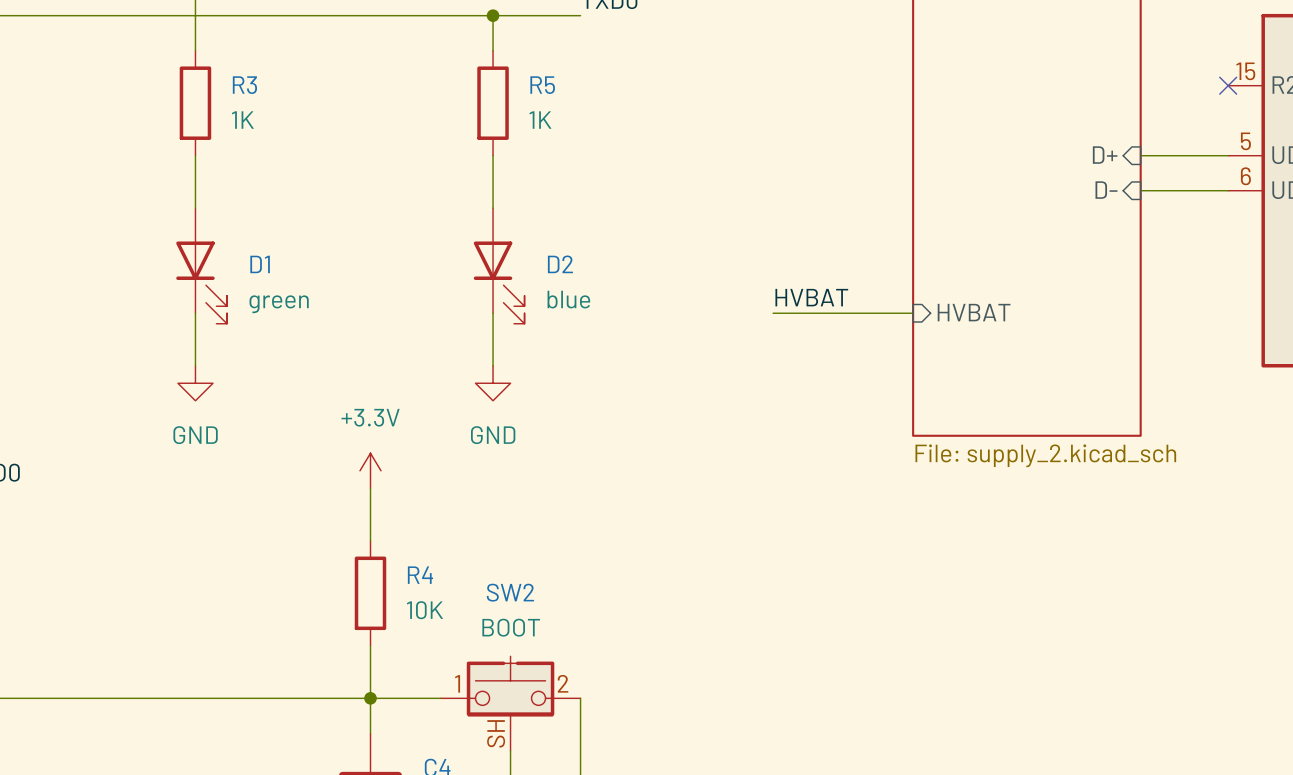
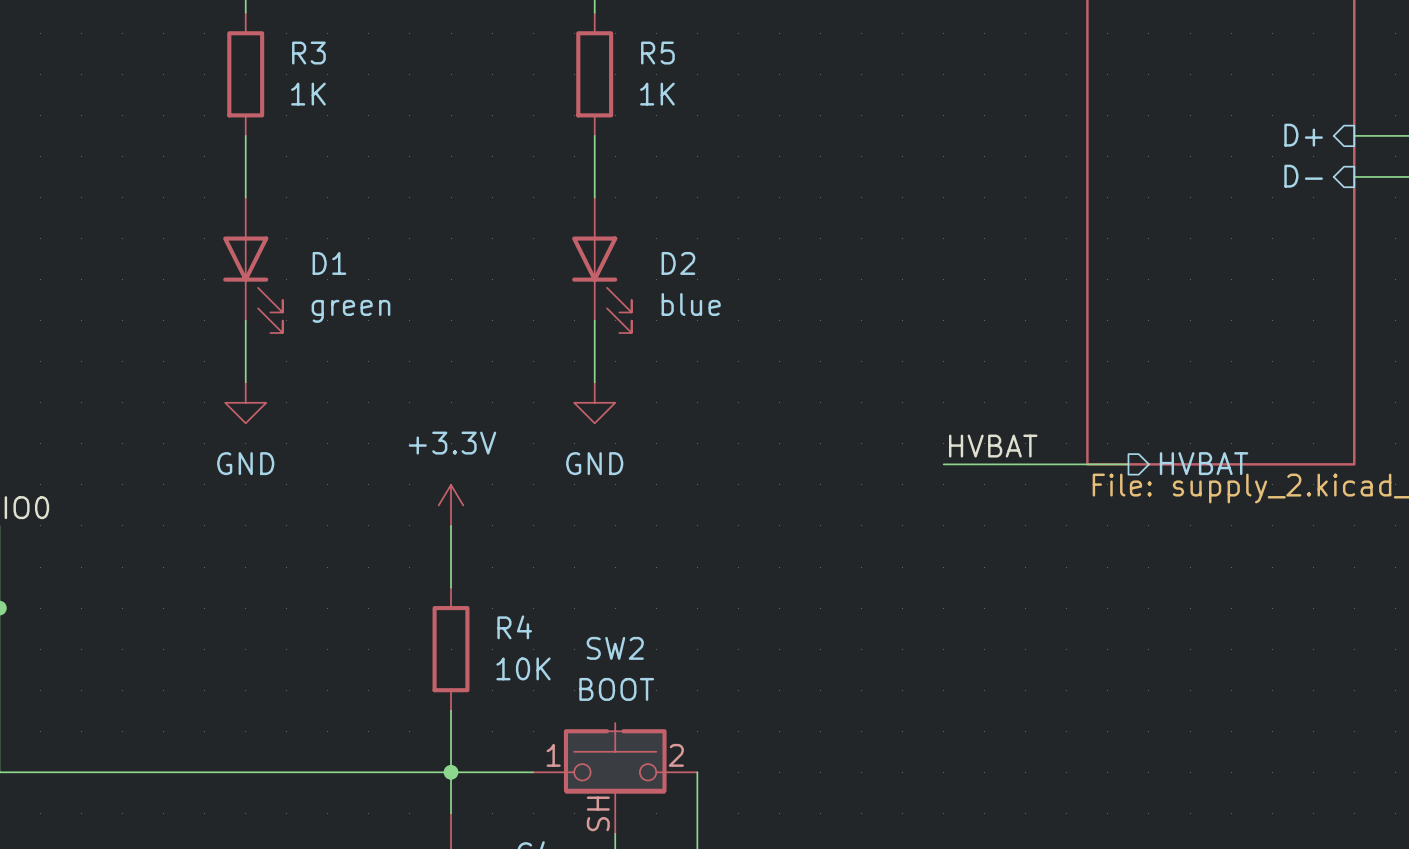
label position: HVBAT (811, 297) -> HVBAT (993, 446)
sheet pin position: HVBAT (974, 312) -> HVBAT (1204, 463)
wire: (773, 313) (913, 313) -> none
wire: none -> (943, 464) (1128, 464)

